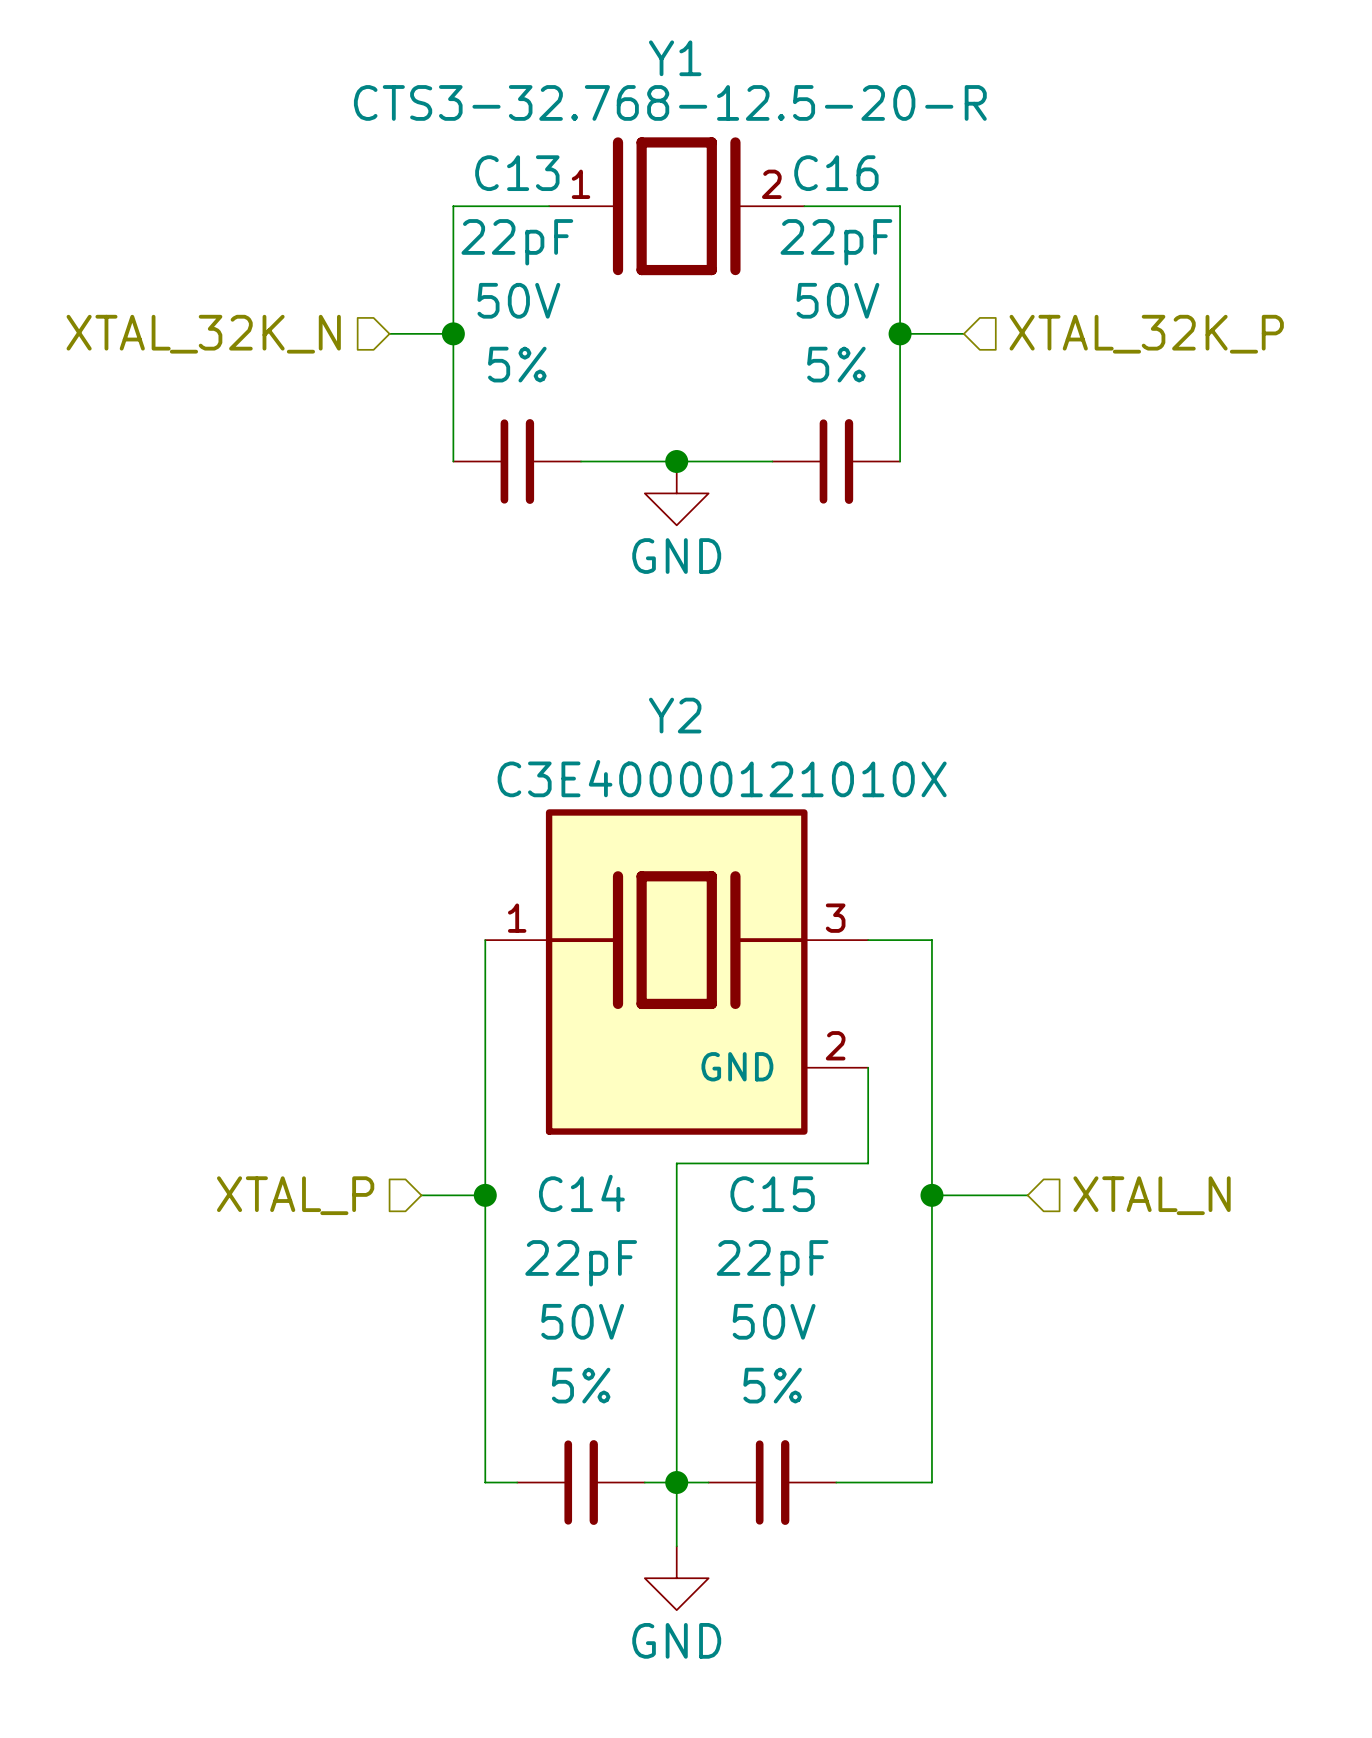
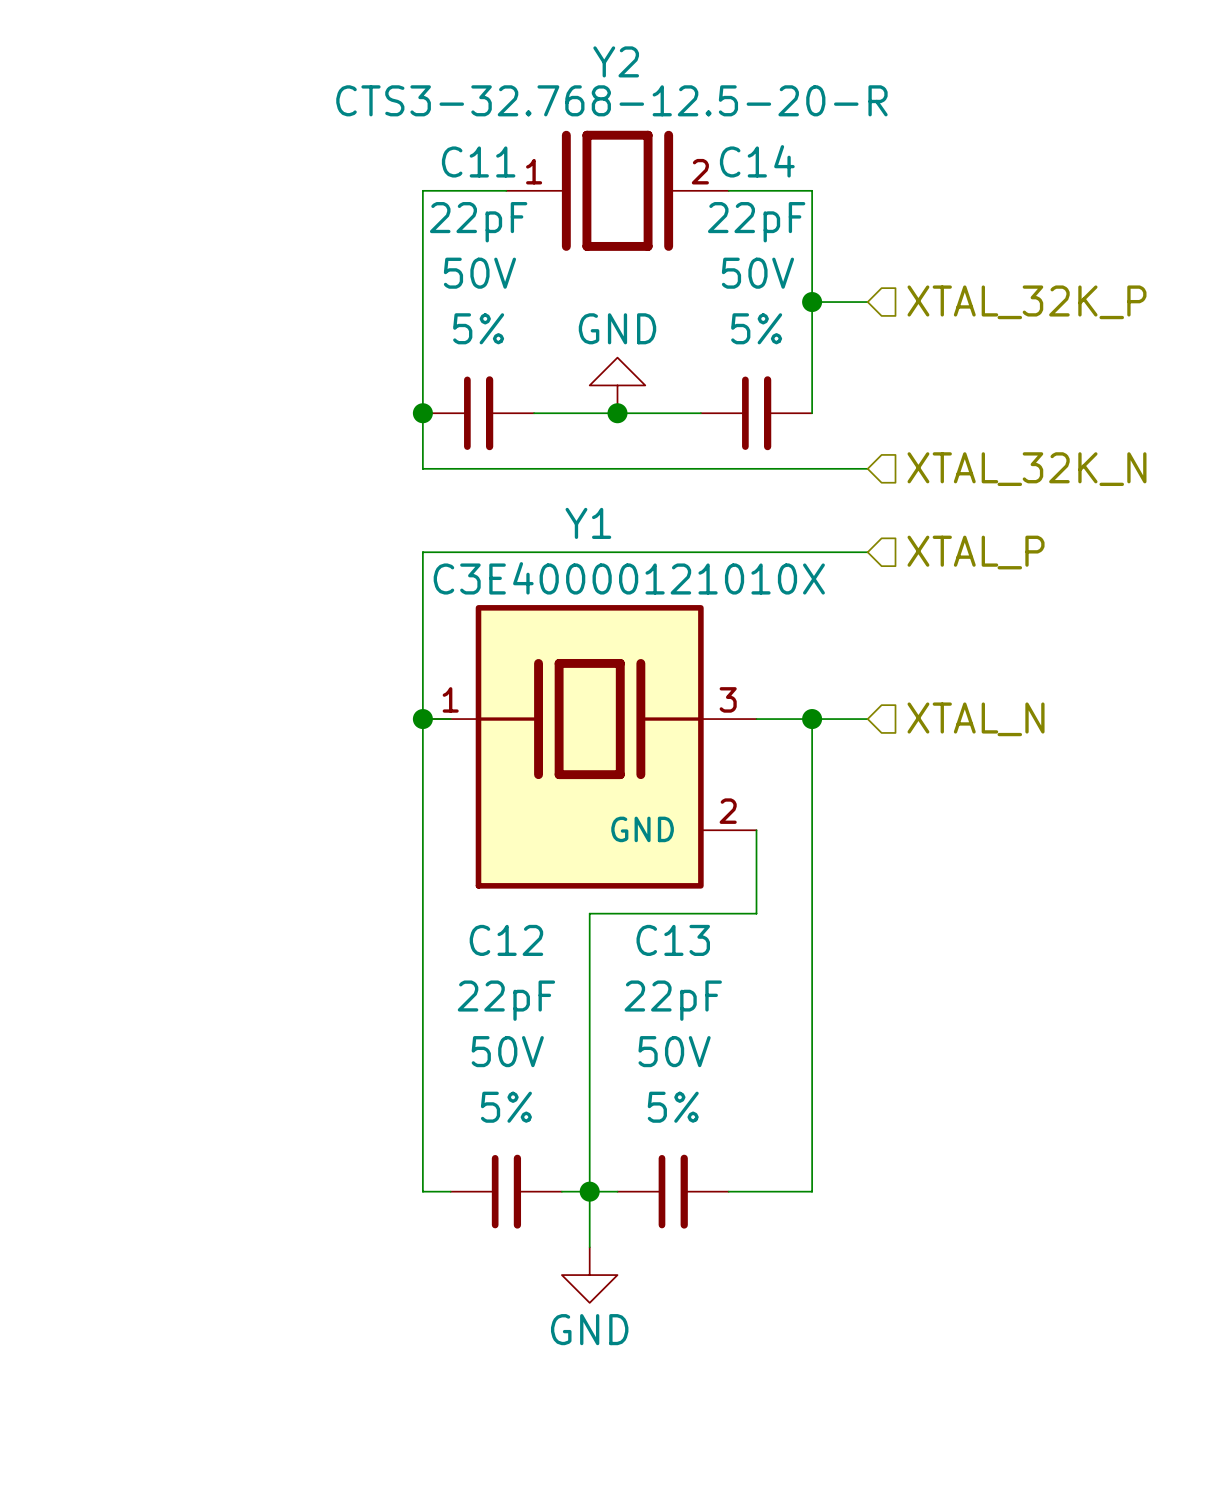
Y1 name: Y1 (675, 58) -> Y2 (616, 61)
C13 name: C13 (517, 173) -> C11 (478, 161)
C16 name: C16 (836, 173) -> C14 (757, 161)
wire: (389, 333) (453, 333) -> none
junction position: (453, 333) -> (422, 413)
hierarchical label: XTAL_32K_N (203, 334) -> none
wire: none -> (422, 413) (422, 468) (867, 468)
power symbol rotation: 0° (676, 493) -> 180° (617, 385)
power symbol position: GND (676, 493) -> GND (617, 385)
hierarchical label: none -> XTAL_32K_N (1027, 469)
wire: none -> (867, 552) (422, 552) (422, 1191) (450, 1191)
hierarchical label: none -> XTAL_P (976, 552)
wire: none -> (422, 719) (450, 719)
junction: none -> (422, 719)
wire: none -> (756, 719) (867, 719)
wire: none -> (812, 719) (812, 1191) (728, 1191)
junction: none -> (812, 719)
Y1: none -> C3E40000121010X (589, 746)
wire: (485, 940) (485, 1482) (517, 1482) -> none
wire: (868, 940) (931, 940) (931, 1482) (836, 1482) -> none
Y2: C3E40000121010X (676, 972) -> none
wire: (868, 1067) (868, 1163) (676, 1163) (676, 1546) -> (756, 830) (756, 913) (589, 913) (589, 1247)
hierarchical label: XTAL_P (295, 1195) -> none
wire: (421, 1195) (485, 1195) -> none
junction: (485, 1195) -> none
wire: (931, 1195) (1027, 1195) -> none
junction: (931, 1195) -> none
hierarchical label position: XTAL_N (1152, 1195) -> XTAL_N (976, 719)
C12: none -> 22pF (506, 1191)
junction: none -> (589, 1191)
C13: none -> 22pF (673, 1191)
C14: 22pF (581, 1482) -> none
wire: (644, 1482) (708, 1482) -> (561, 1191) (617, 1191)
junction: (676, 1482) -> none
C15: 22pF (772, 1482) -> none
power symbol position: GND (676, 1578) -> GND (589, 1275)

